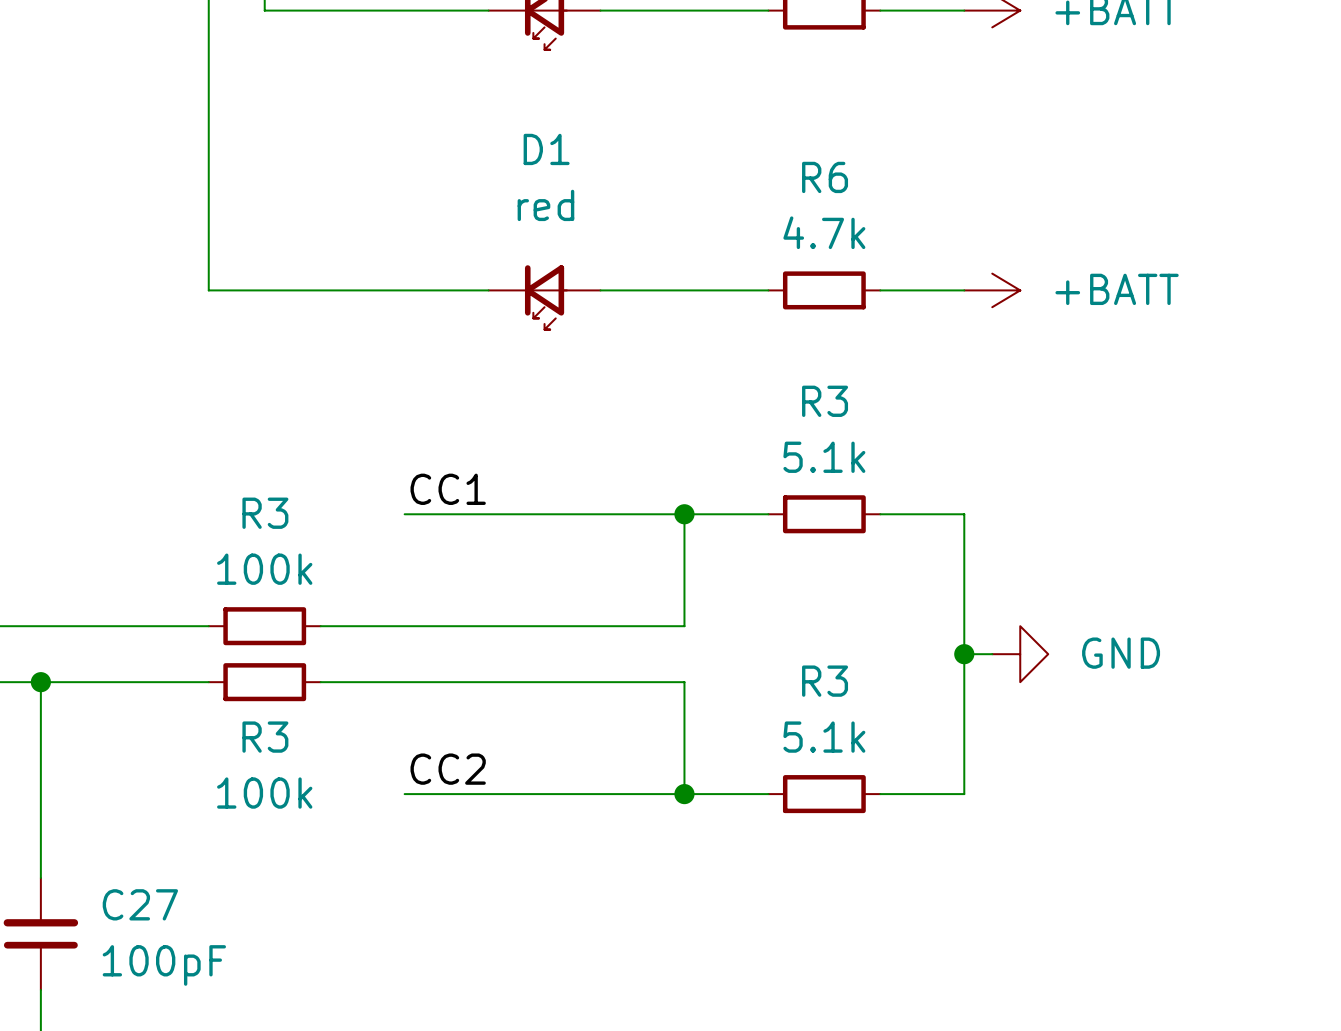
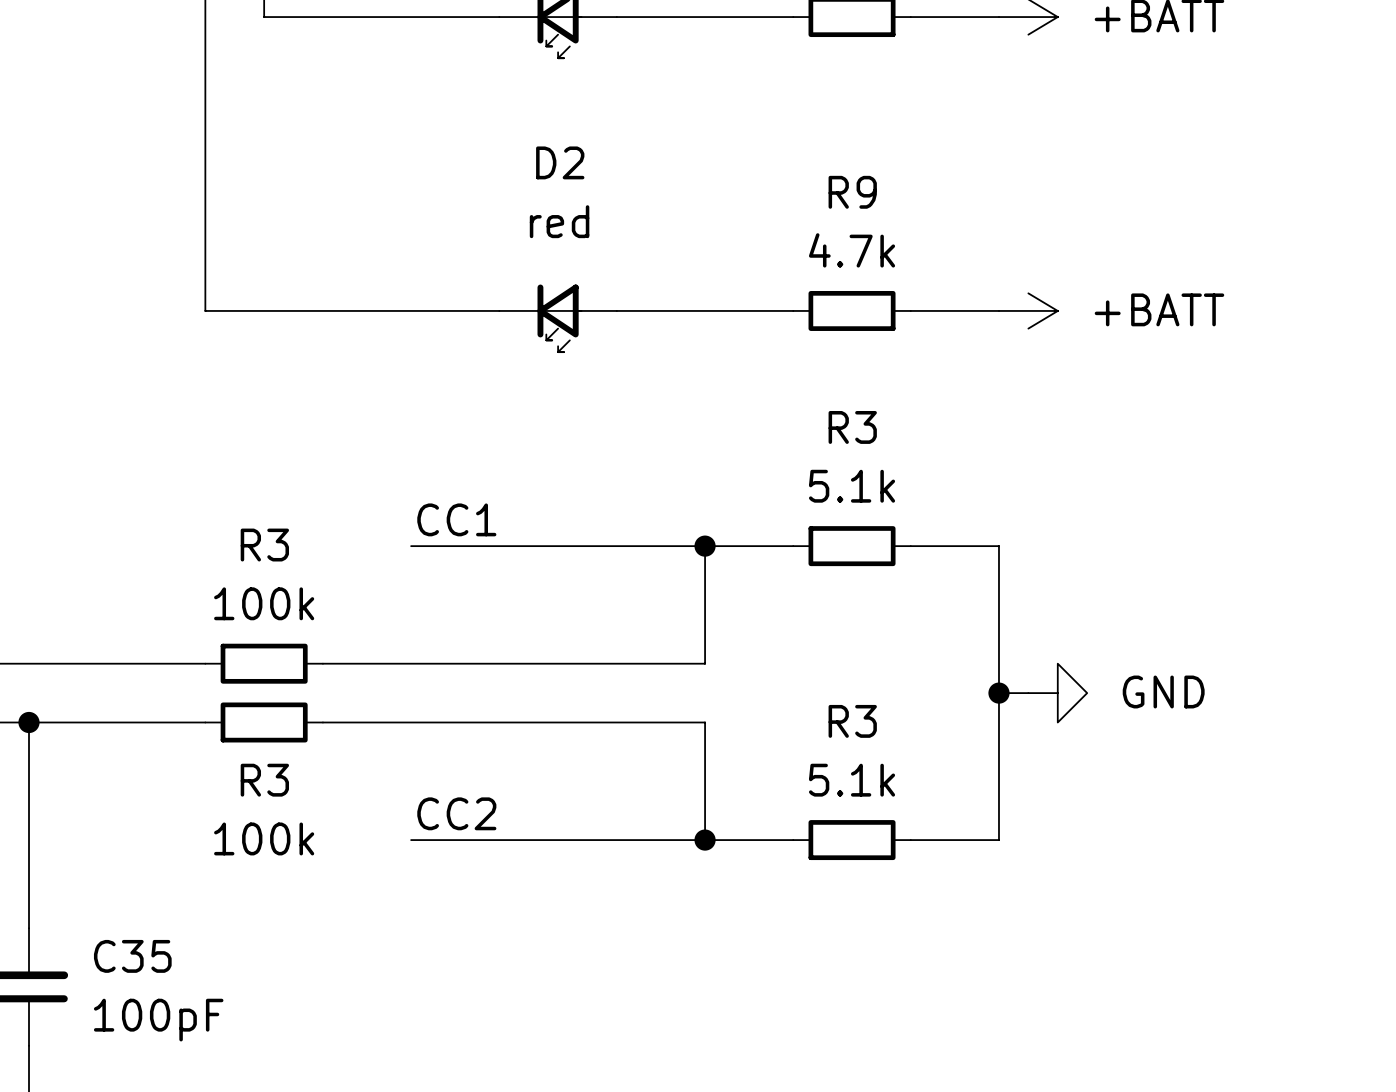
D1 name: D1 (546, 149) -> D2 (560, 162)
R6 name: R6 (825, 177) -> R9 (852, 192)
C27 name: C27 (140, 904) -> C35 (132, 956)

